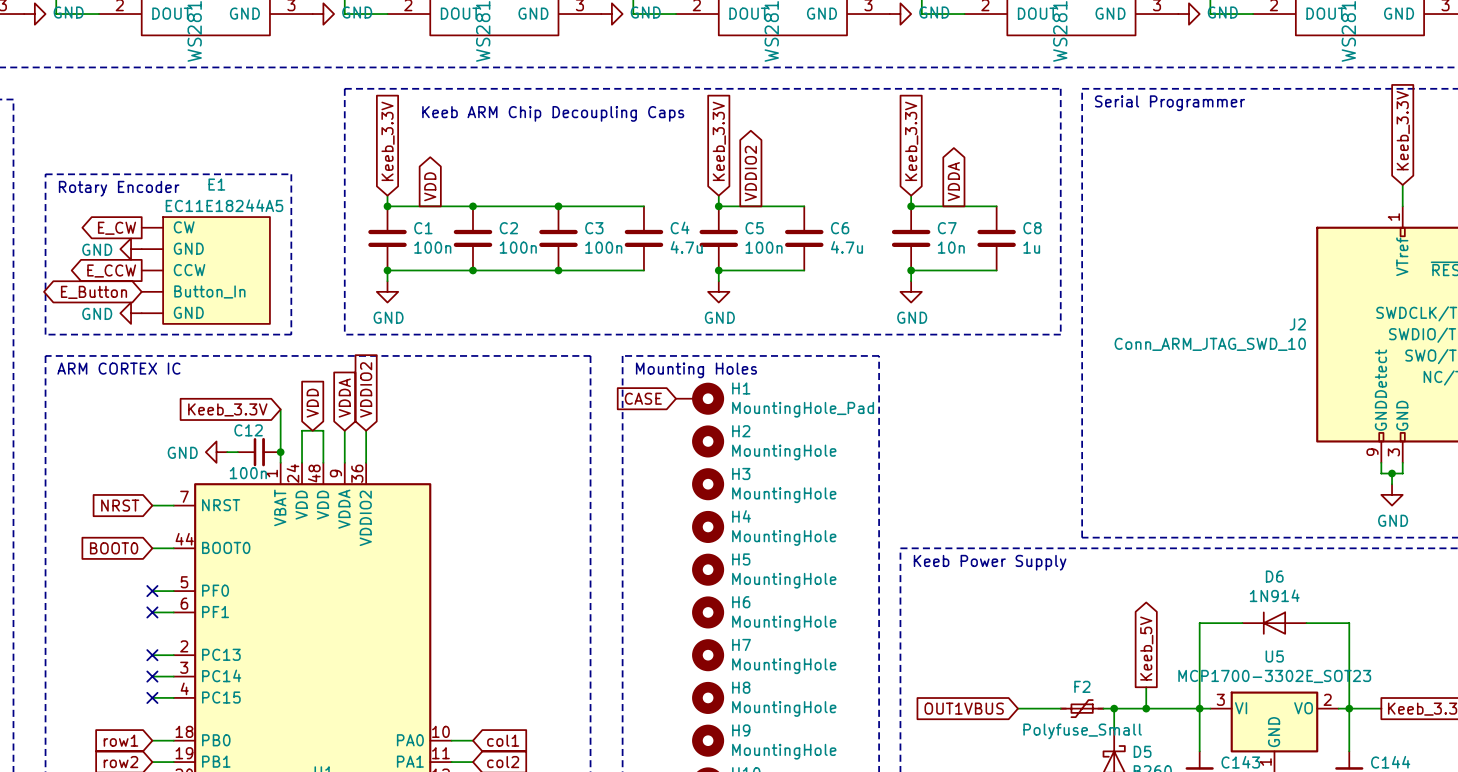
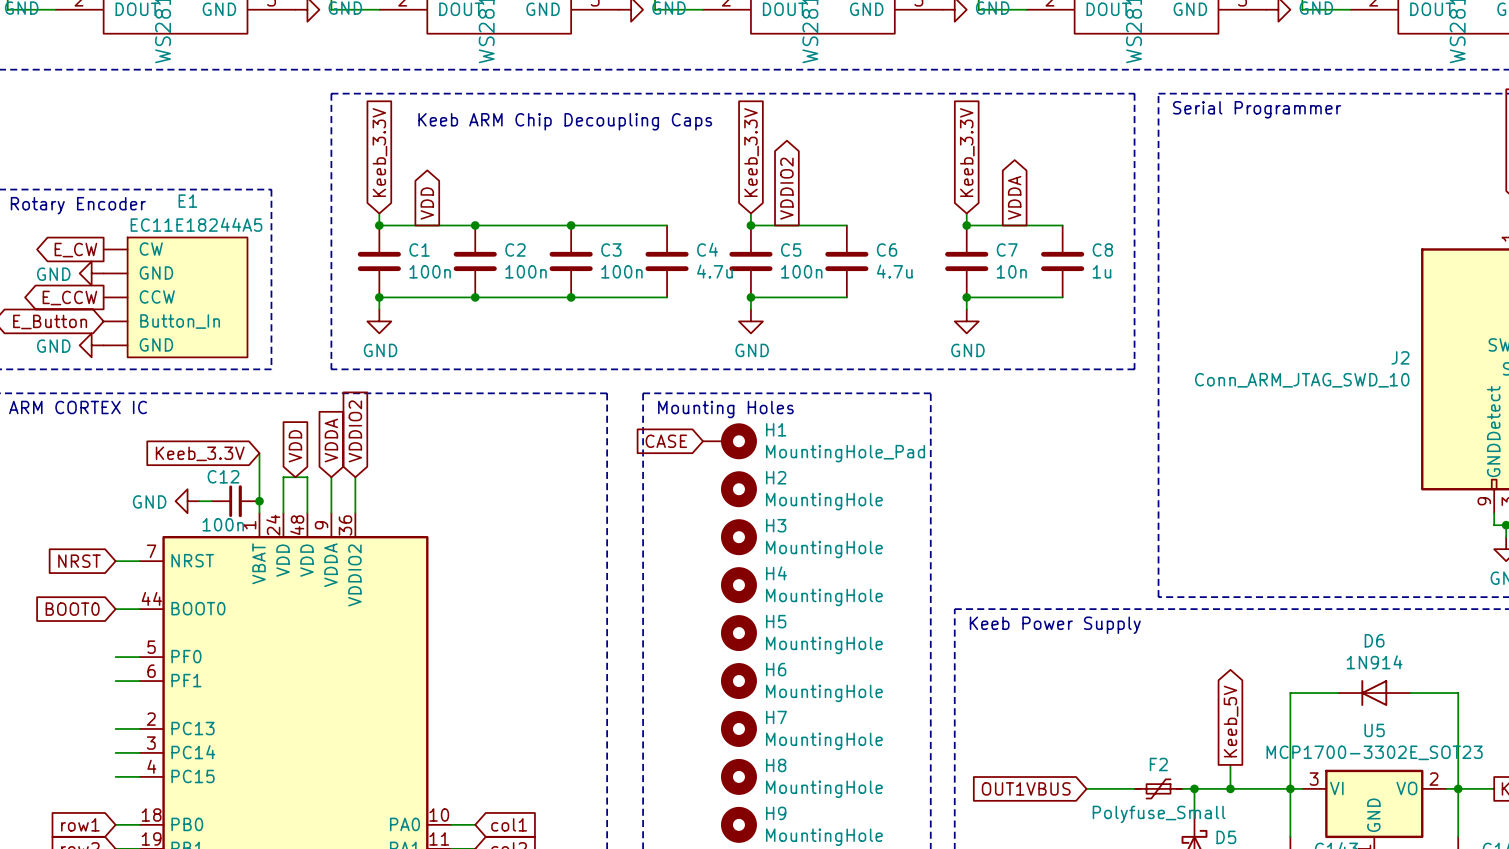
no-connect mark: (152, 591) -> none
no-connect mark: (152, 612) -> none
no-connect mark: (152, 655) -> none
no-connect mark: (152, 676) -> none
no-connect mark: (152, 697) -> none

